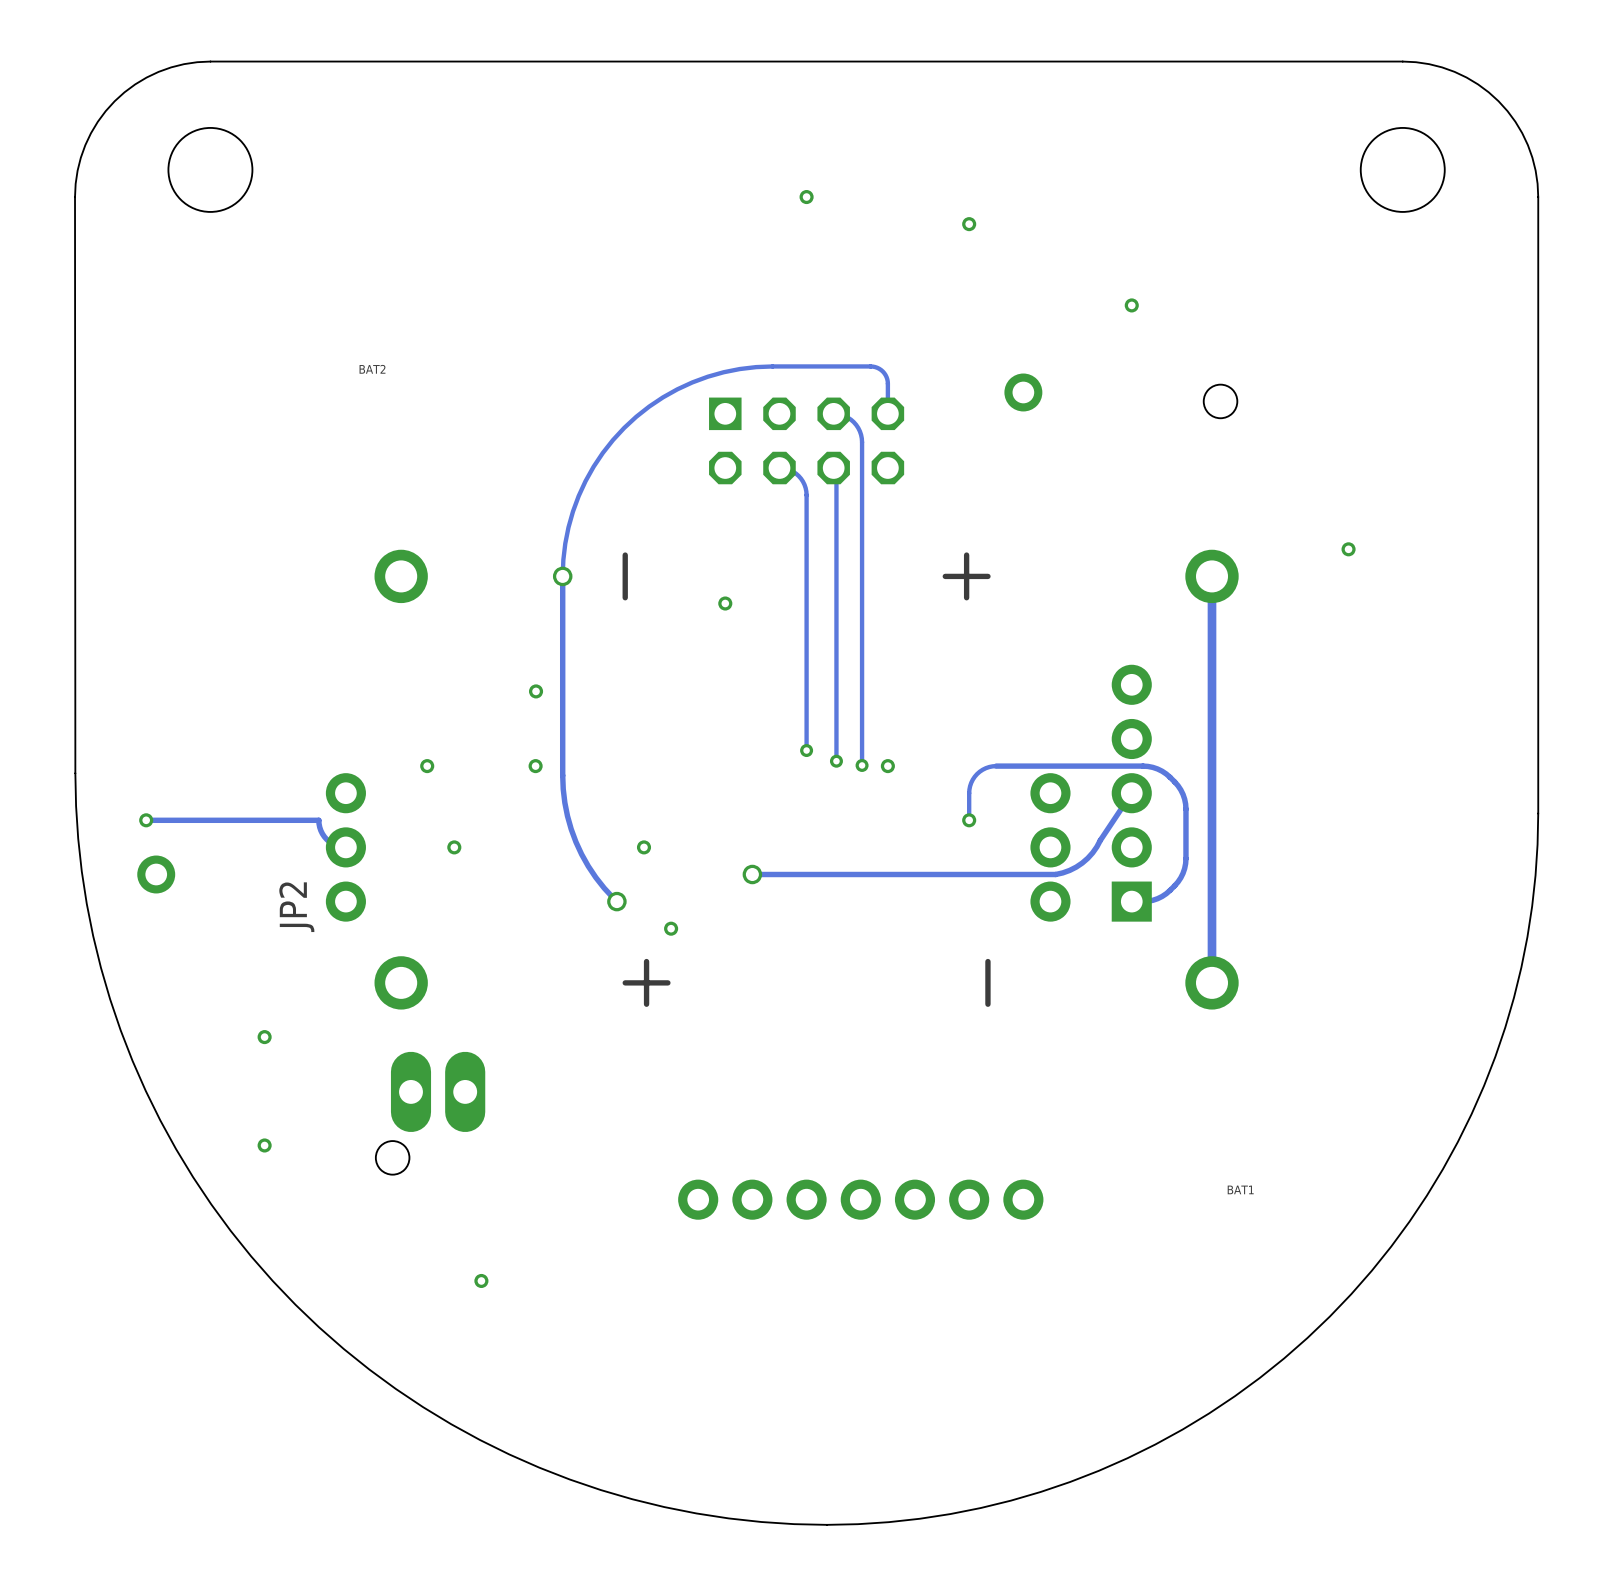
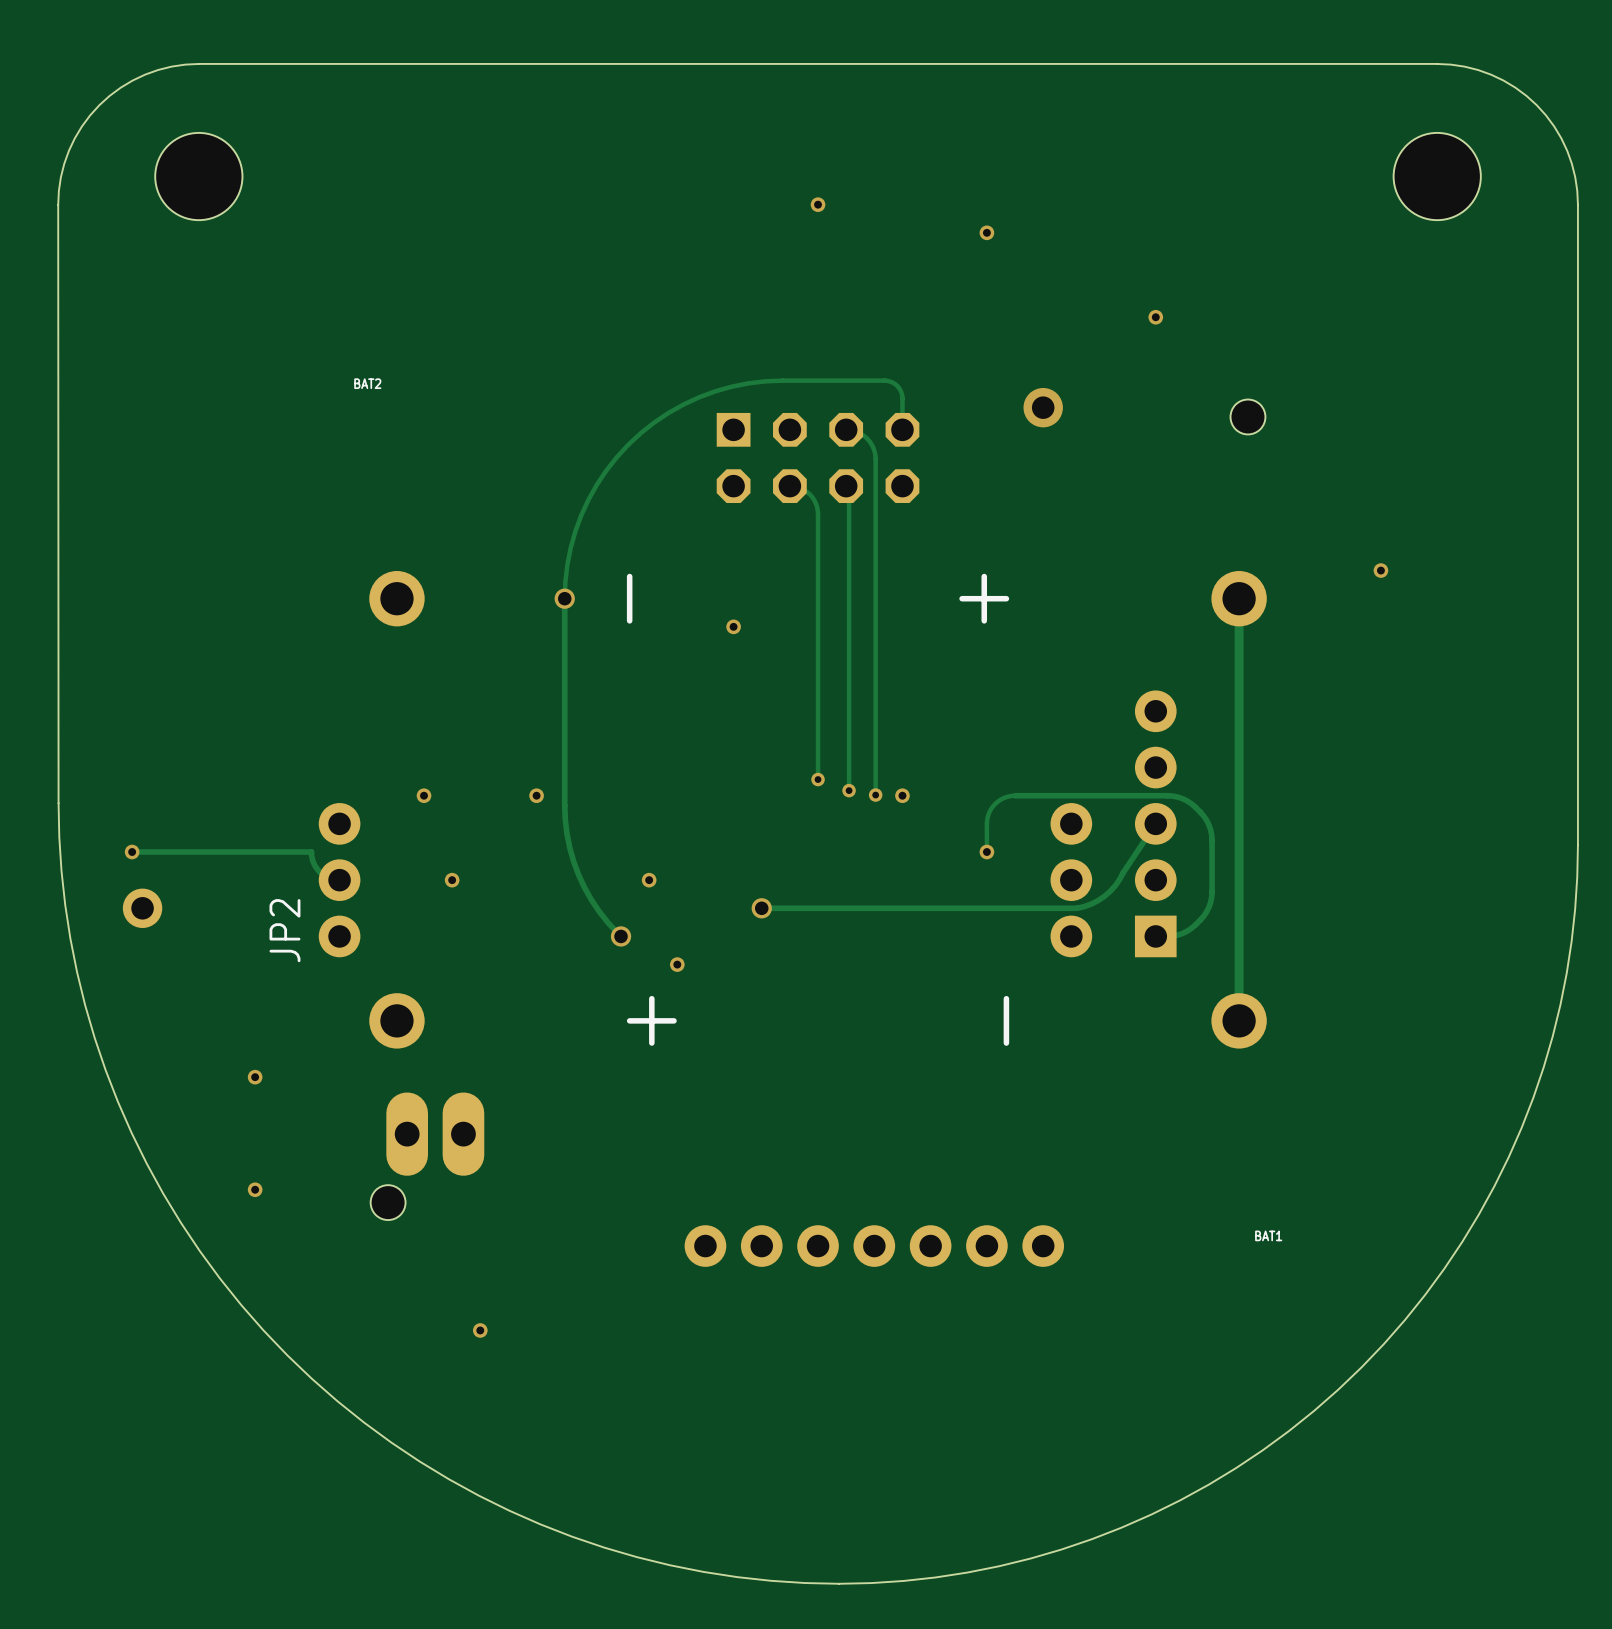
via: (536, 691) -> none

